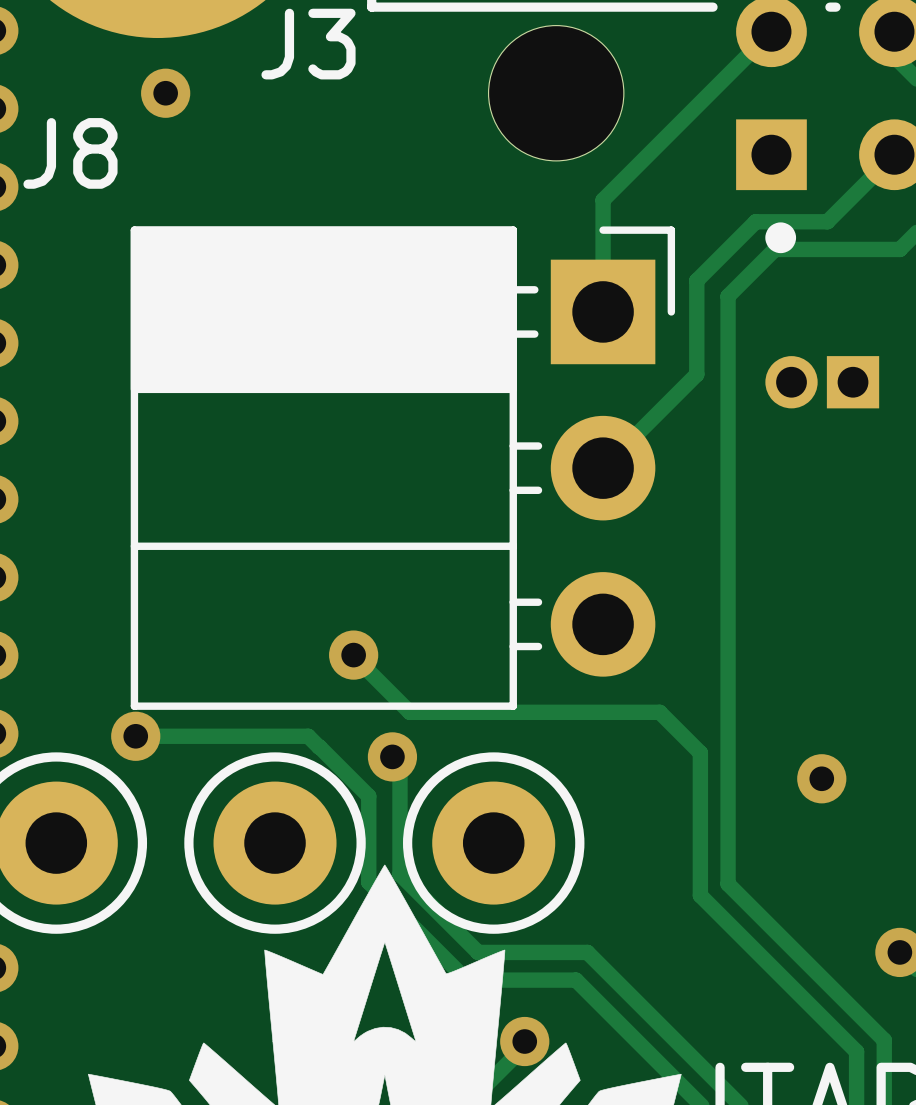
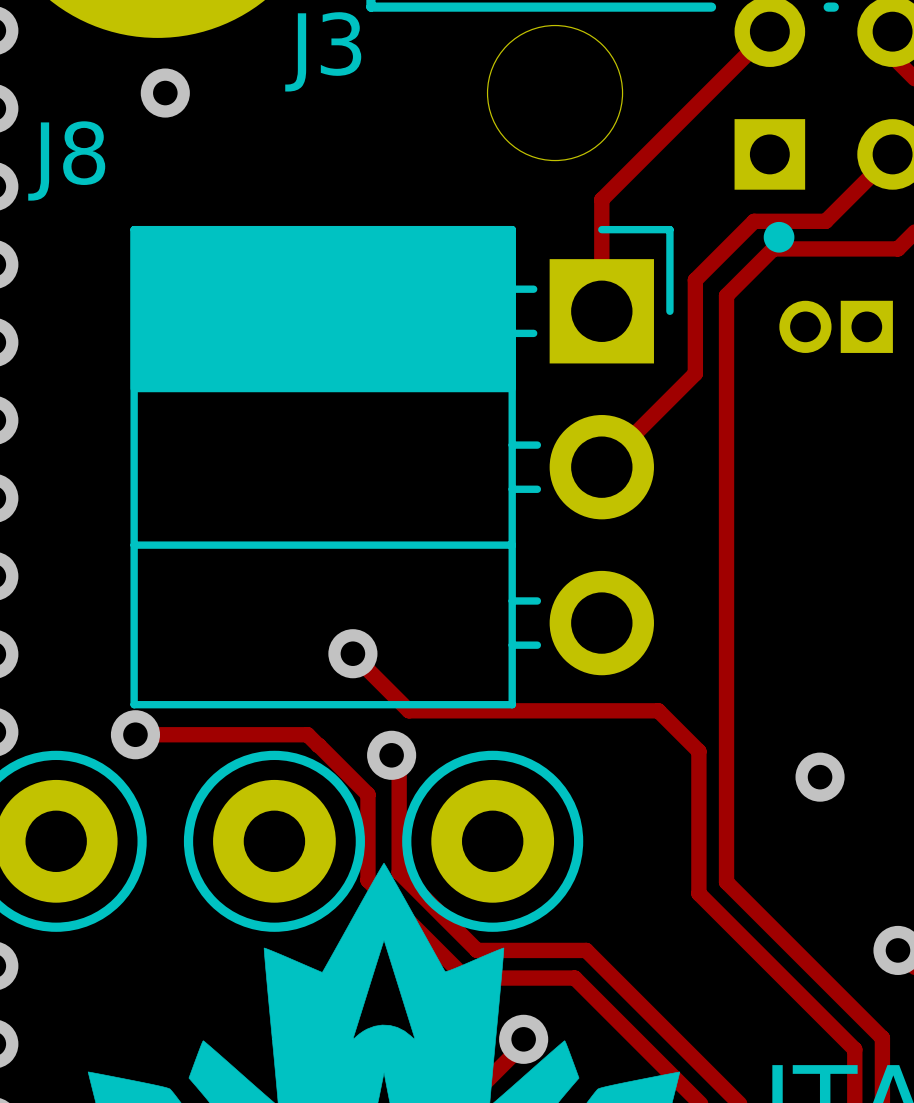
part position: (822, 382) -> (836, 326)

